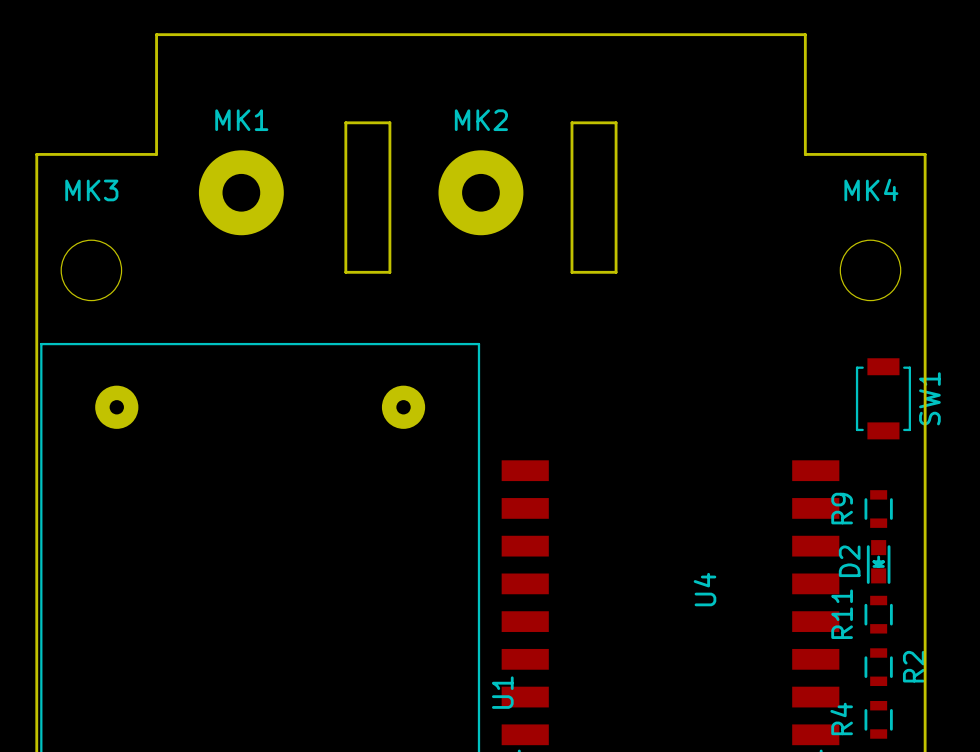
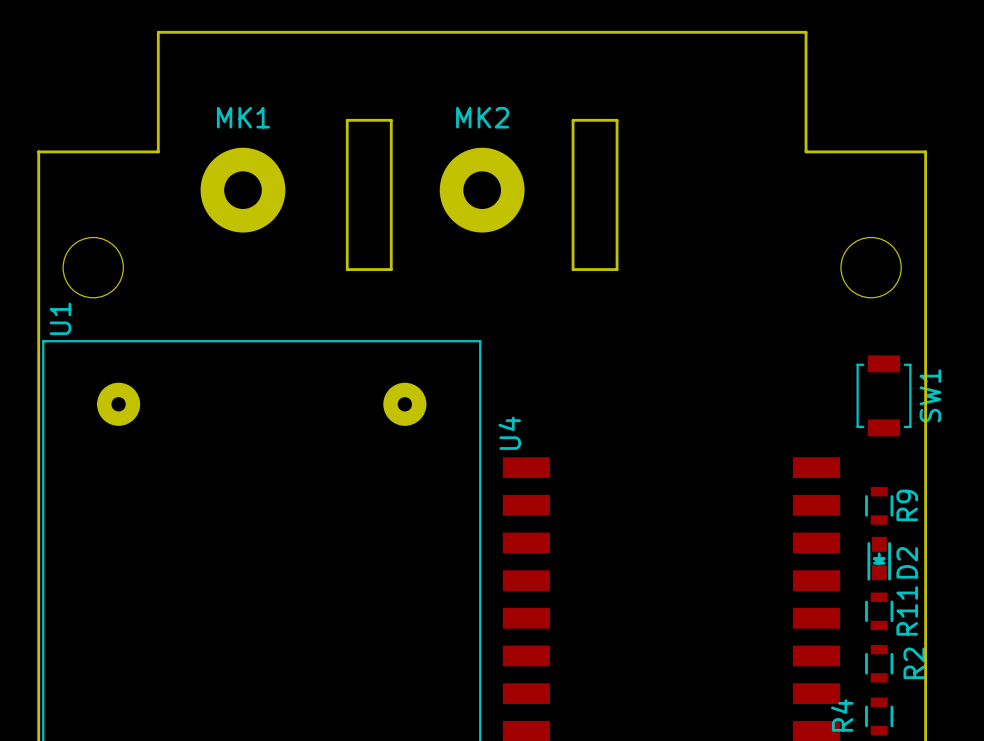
MK3 name: MK3 (91, 190) -> none
MK4 name: MK4 (871, 190) -> none
R9 name position: R9 (842, 508) -> R9 (907, 505)
D2 name position: D2 (849, 561) -> D2 (907, 562)
U4 name position: U4 (705, 589) -> U4 (509, 433)
R11 name position: R11 (842, 614) -> R11 (907, 610)
U1 name position: U1 (502, 692) -> U1 (60, 318)

